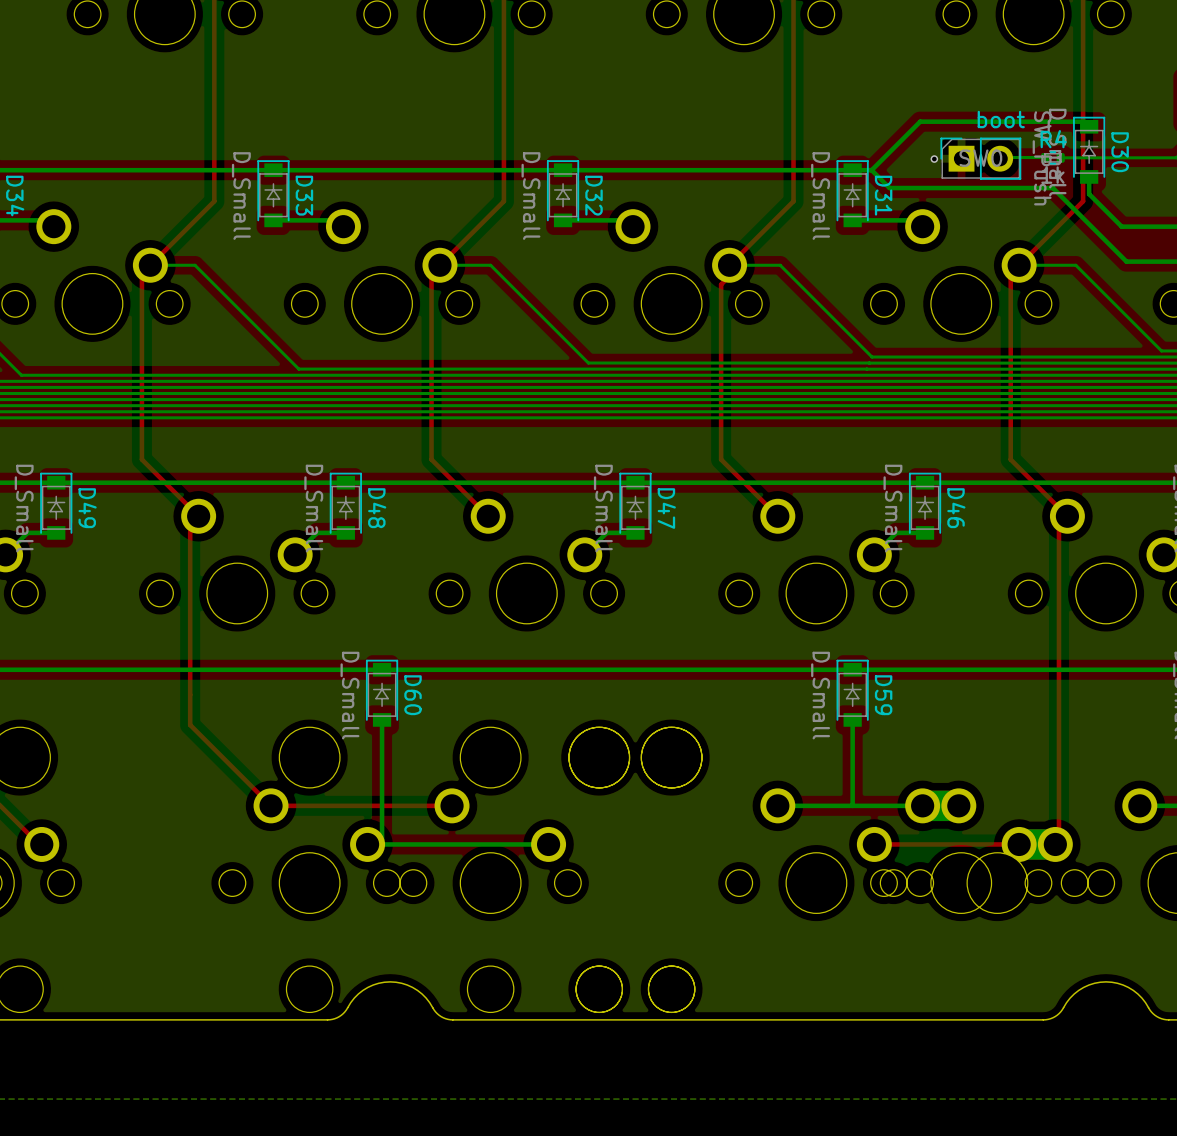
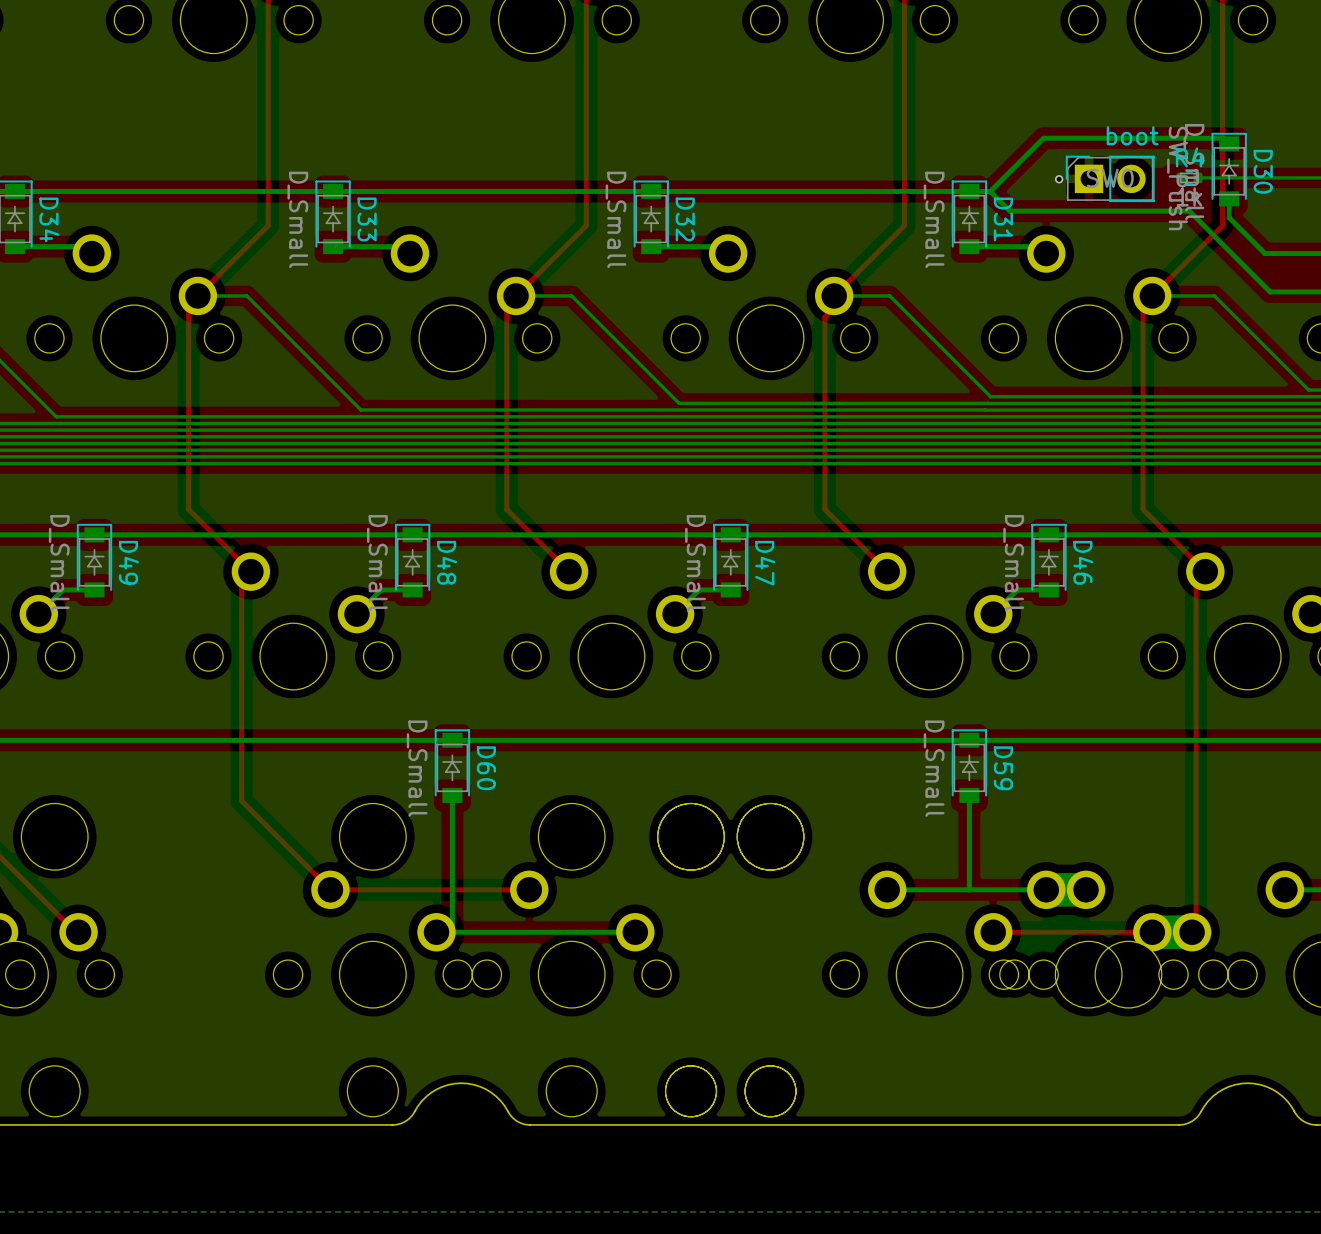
bottom track: (1000, 157) (1045, 157) -> none

